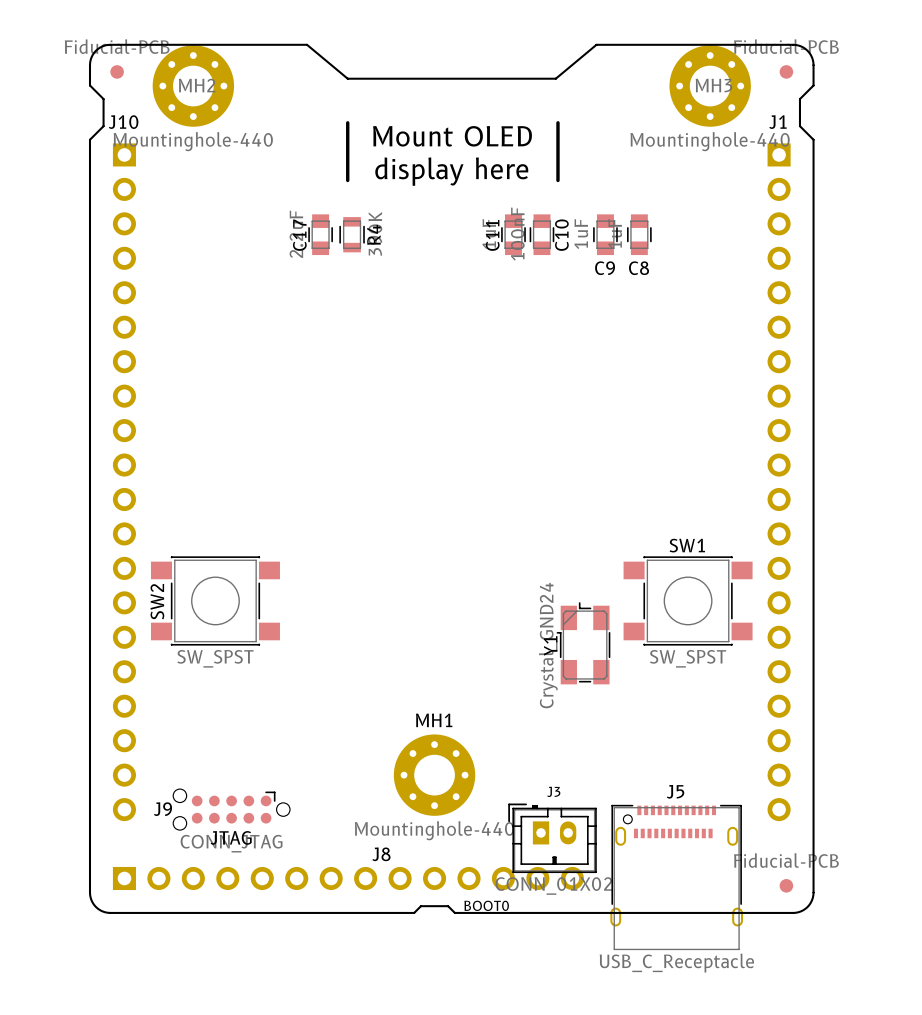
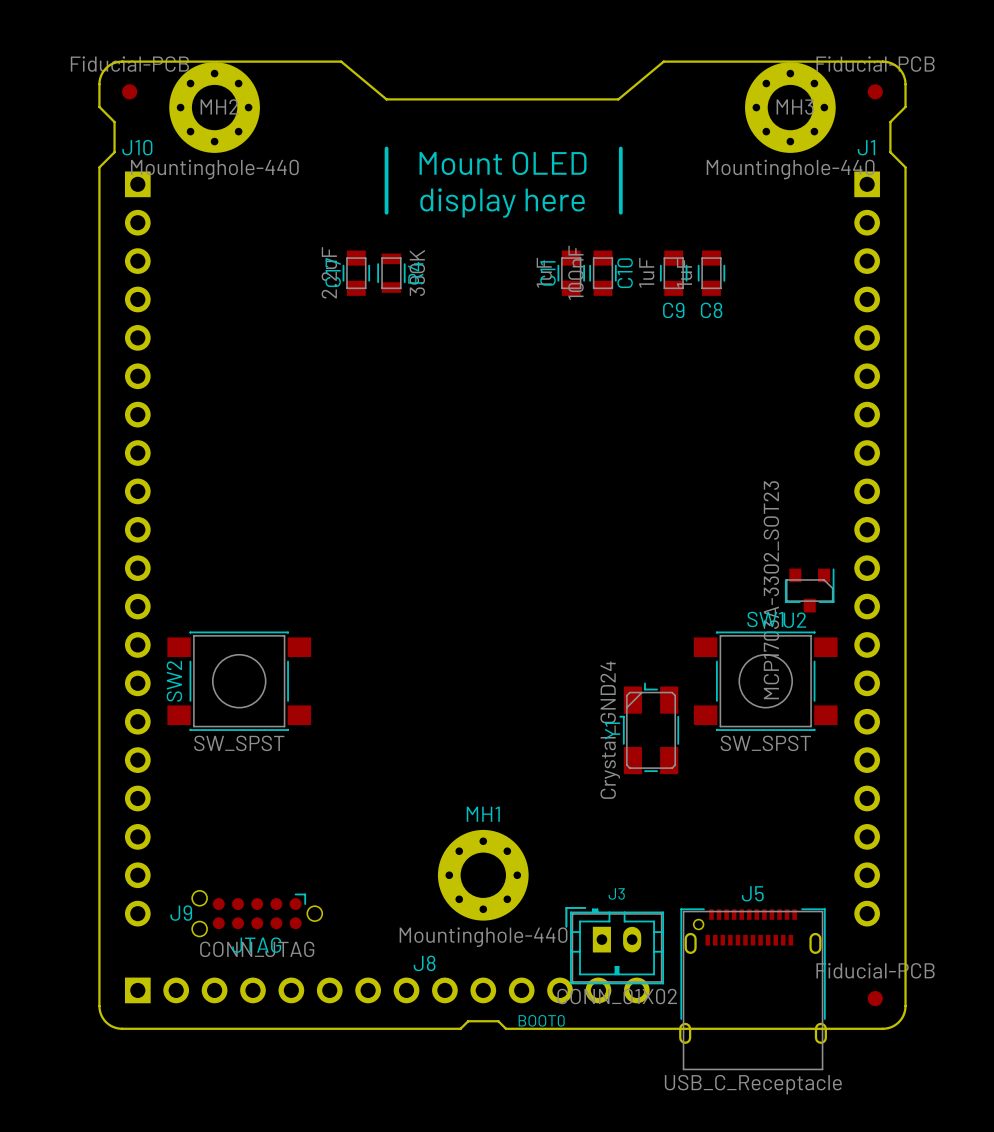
U2: none -> MCP1703A-3302_SOT23 (809, 590)

